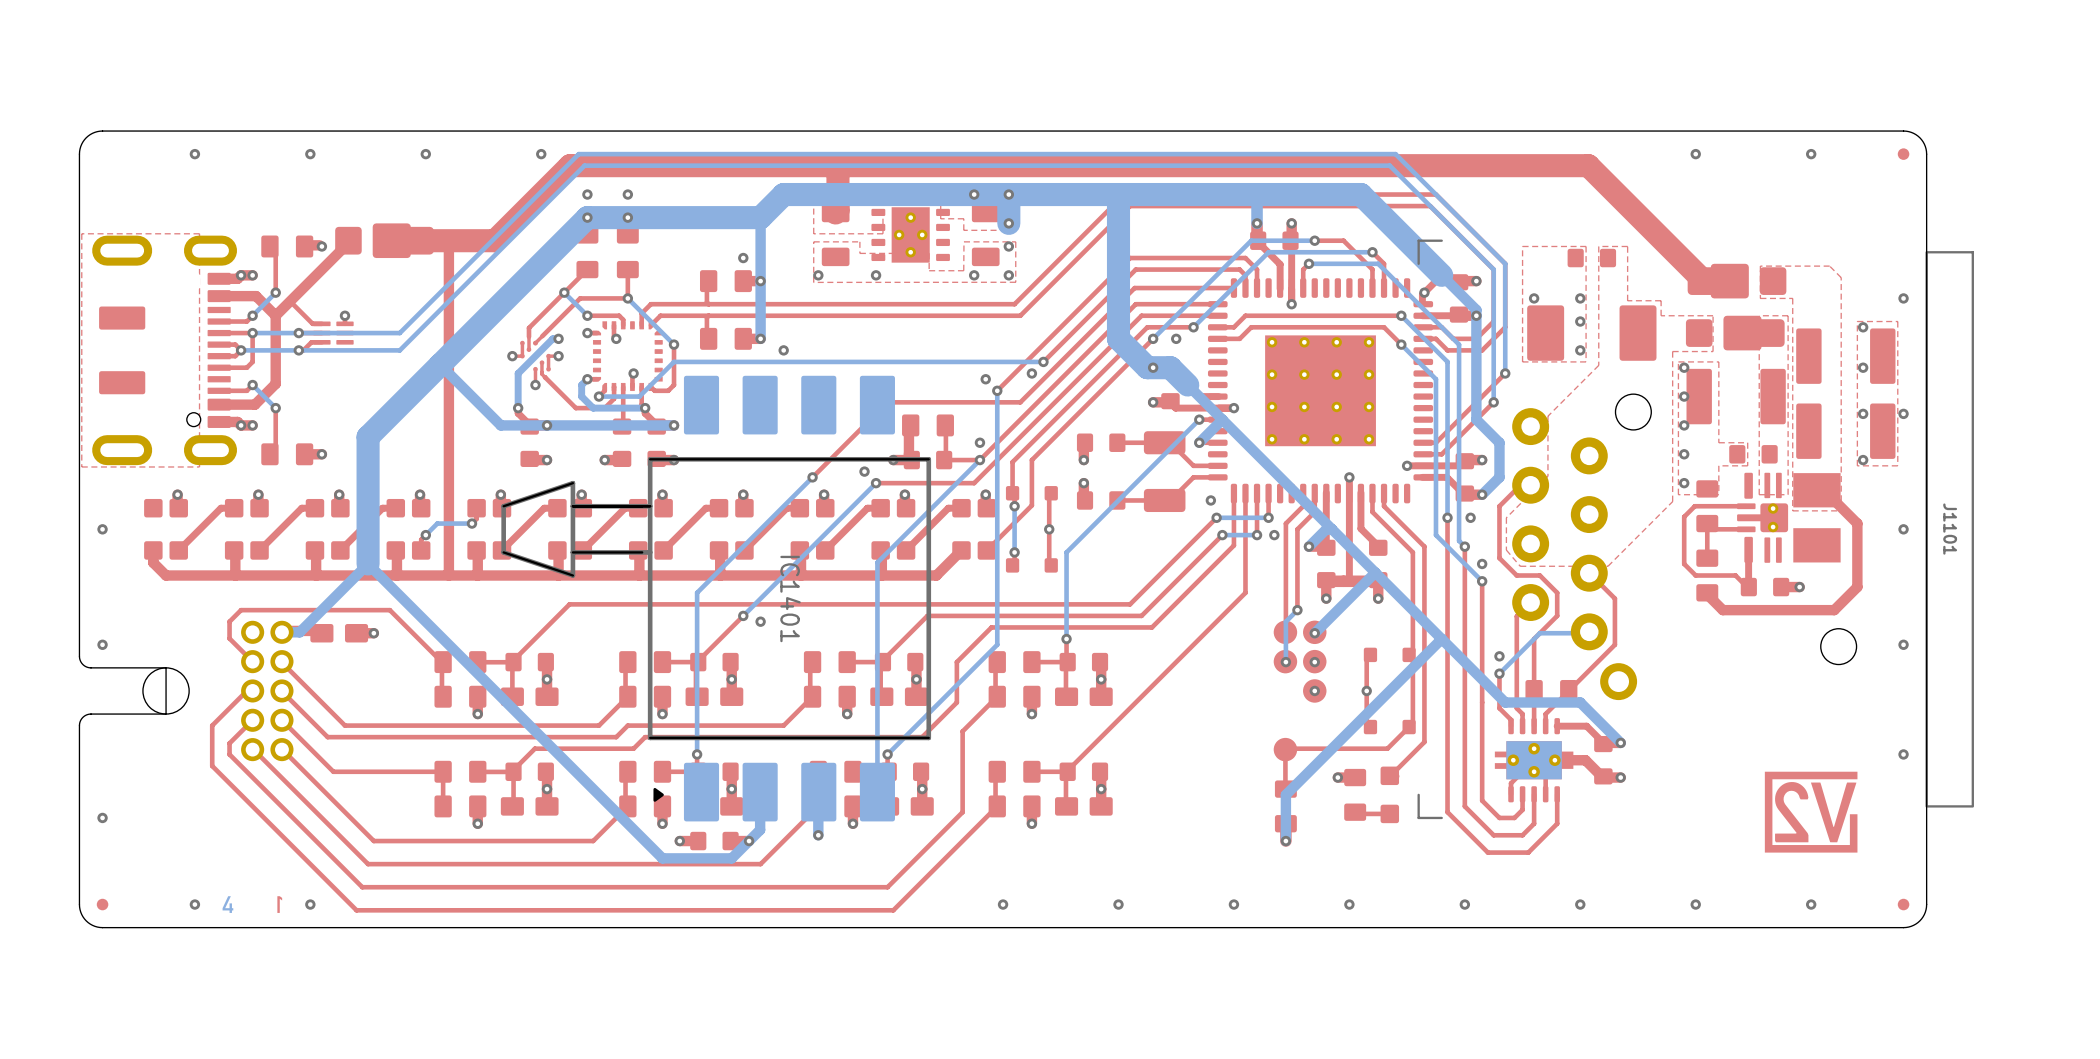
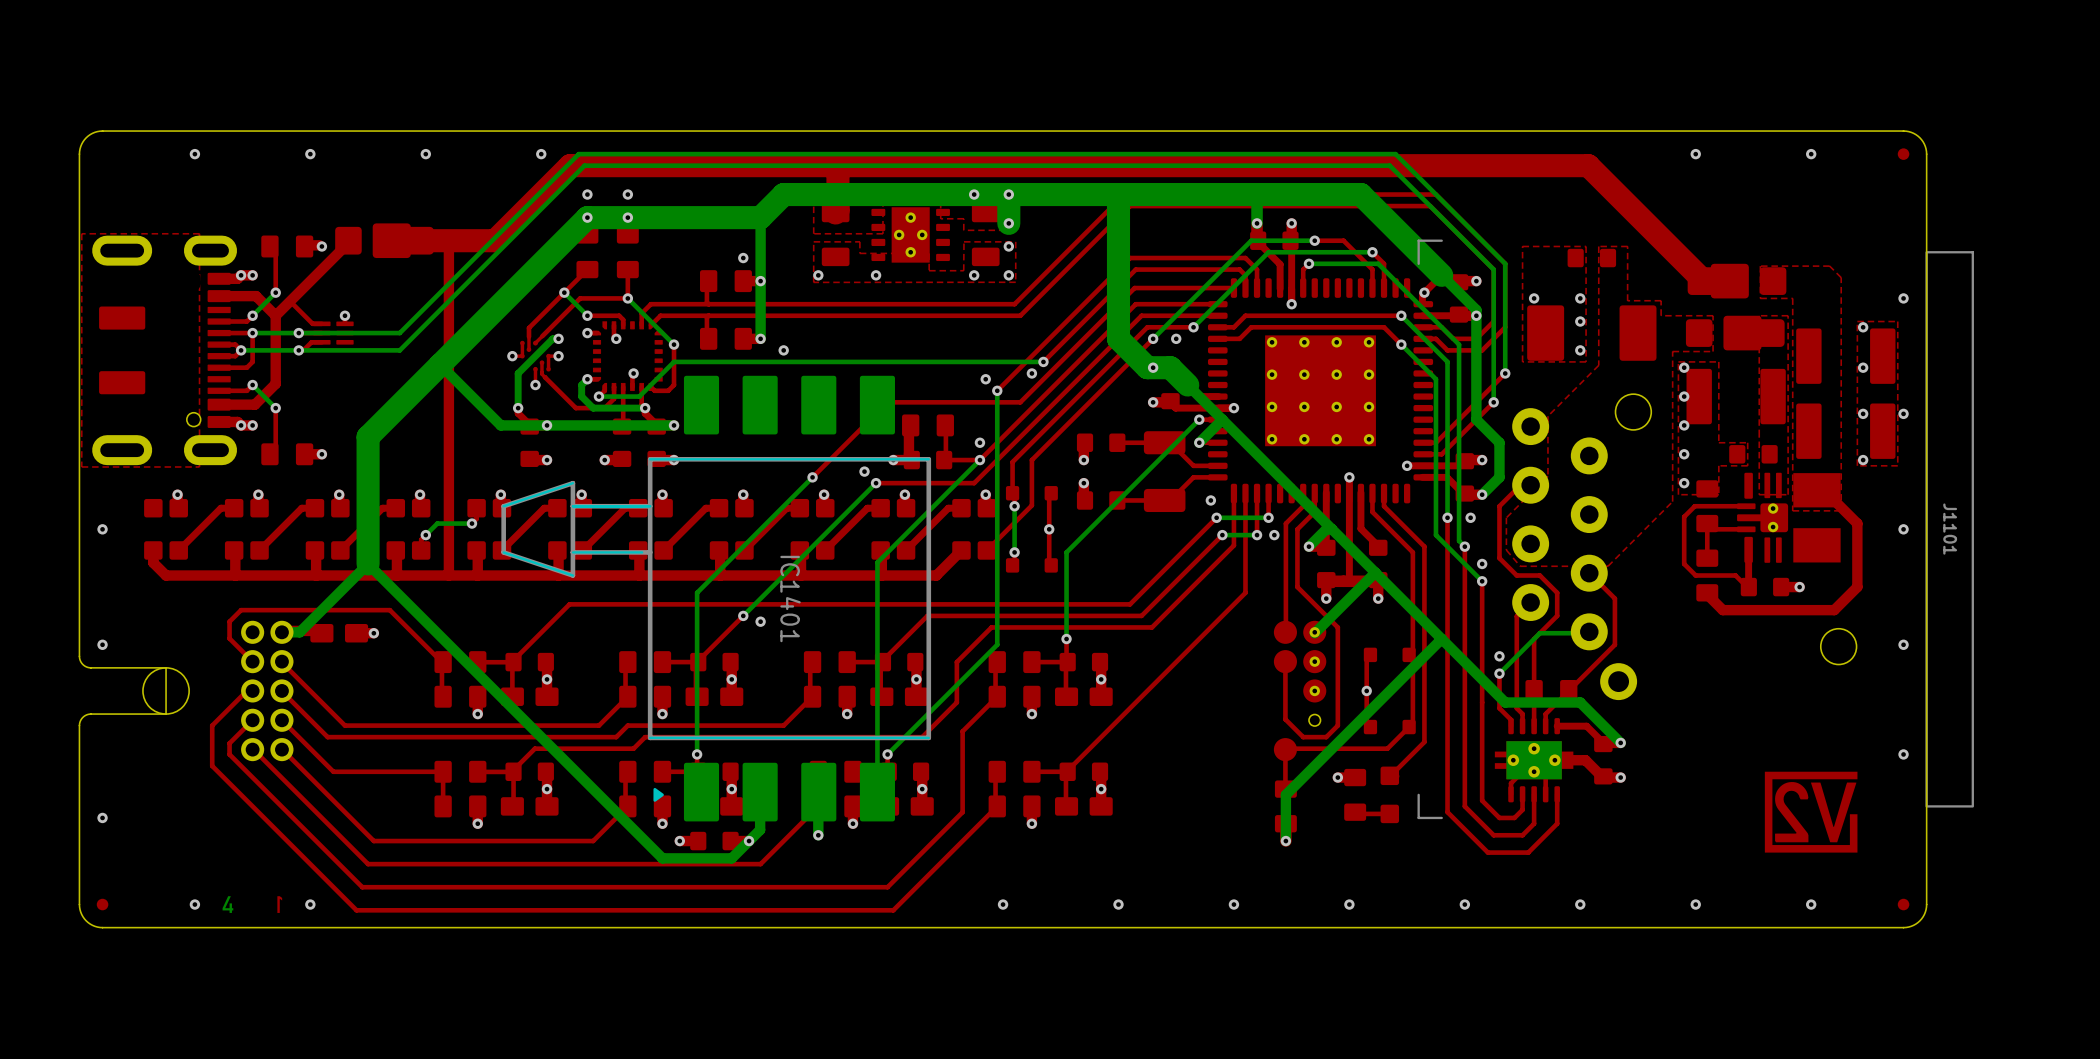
top track: (1297, 587) (1297, 610) -> (1297, 587) (1337, 627) (1337, 725) (1326, 737) (1303, 737) (1285, 719) (1285, 661)
bottom track: (1297, 610) (1285, 621) (1285, 662) -> none
via: (1297, 610) -> none
part footprint: [1273, 620, 1327, 762] -> [1273, 620, 1327, 762]
via: (1314, 633) -> none
via: (1285, 662) -> none
via: (1314, 662) -> none
via: (1314, 690) -> none

